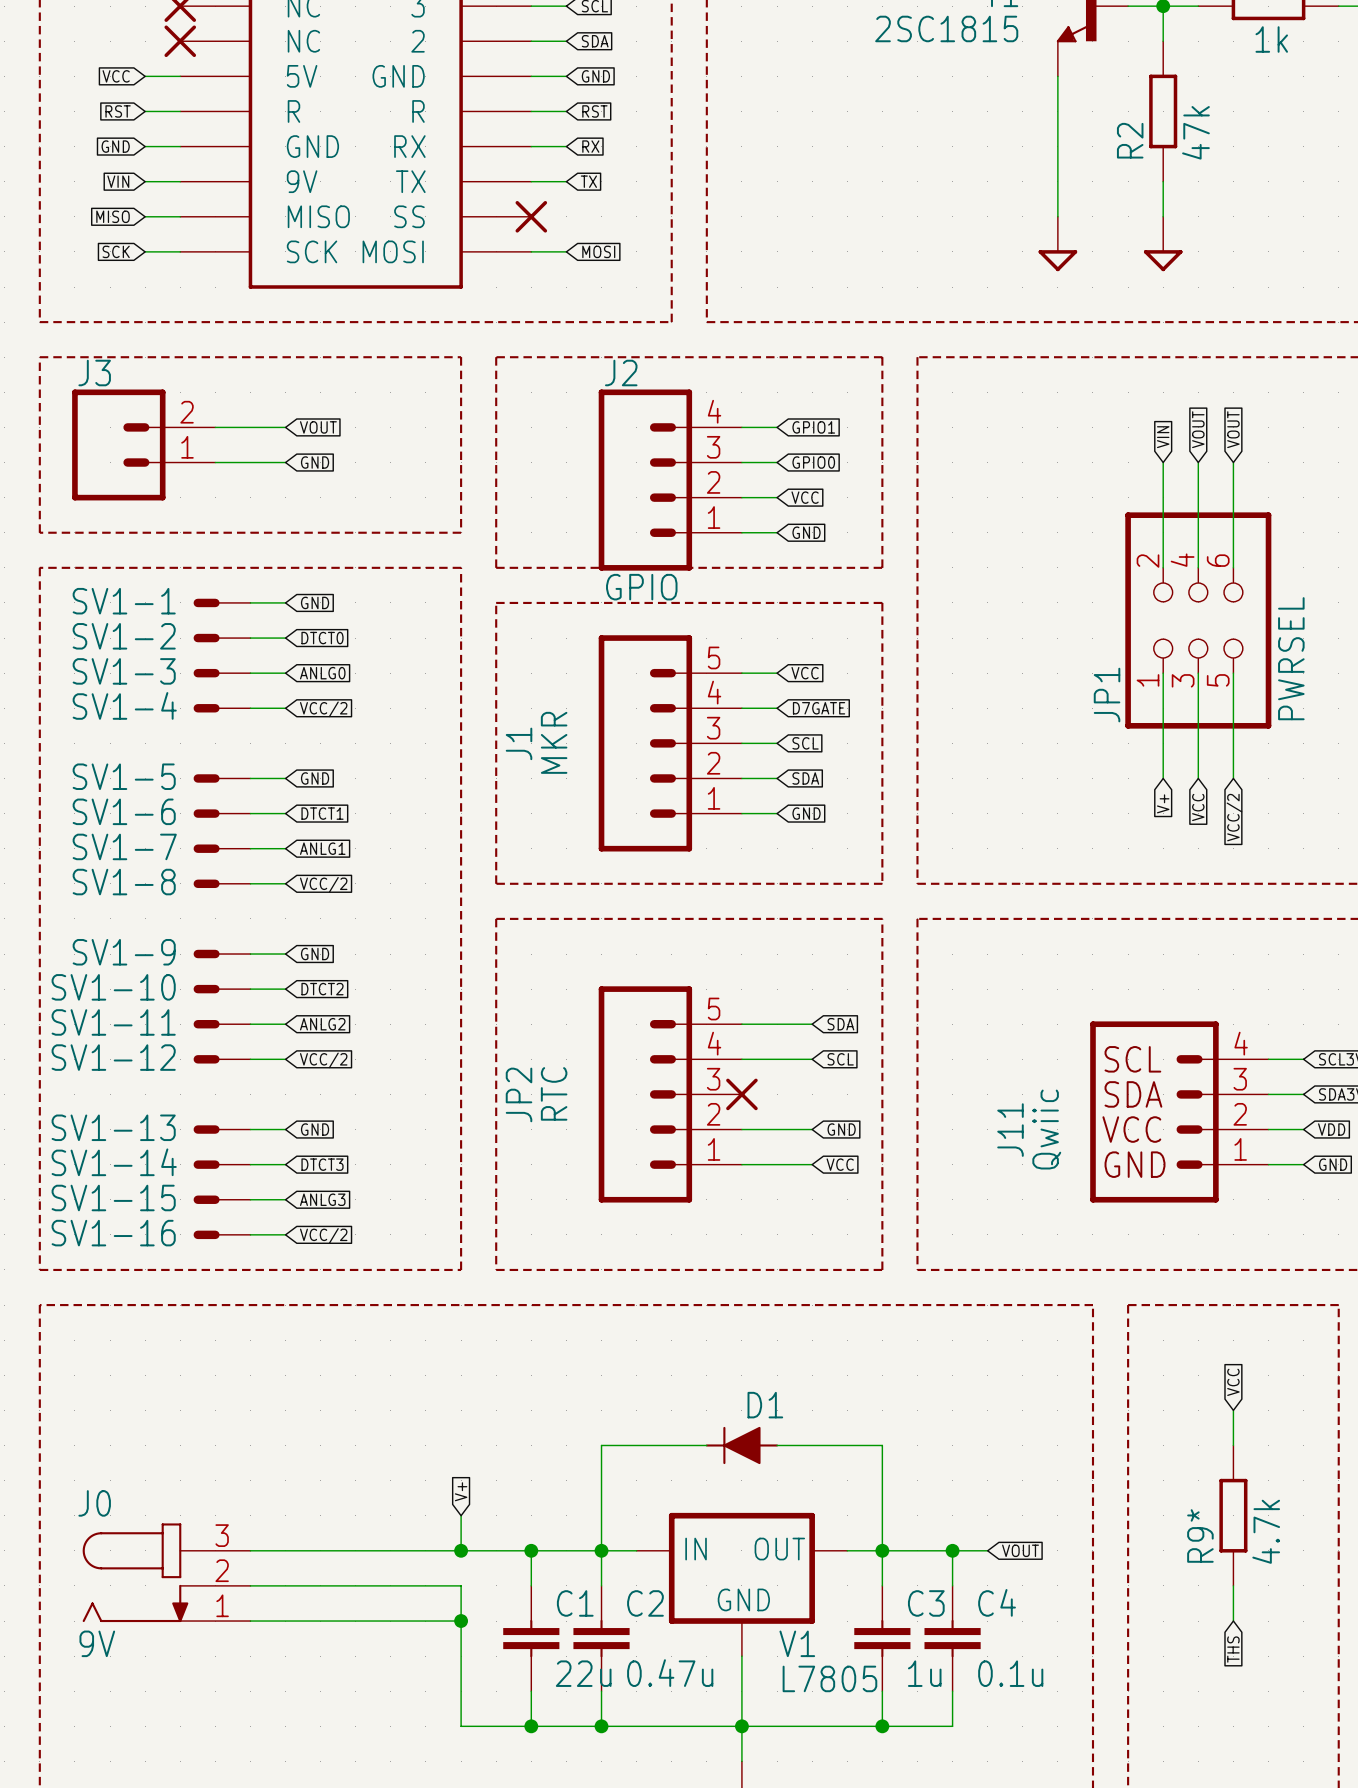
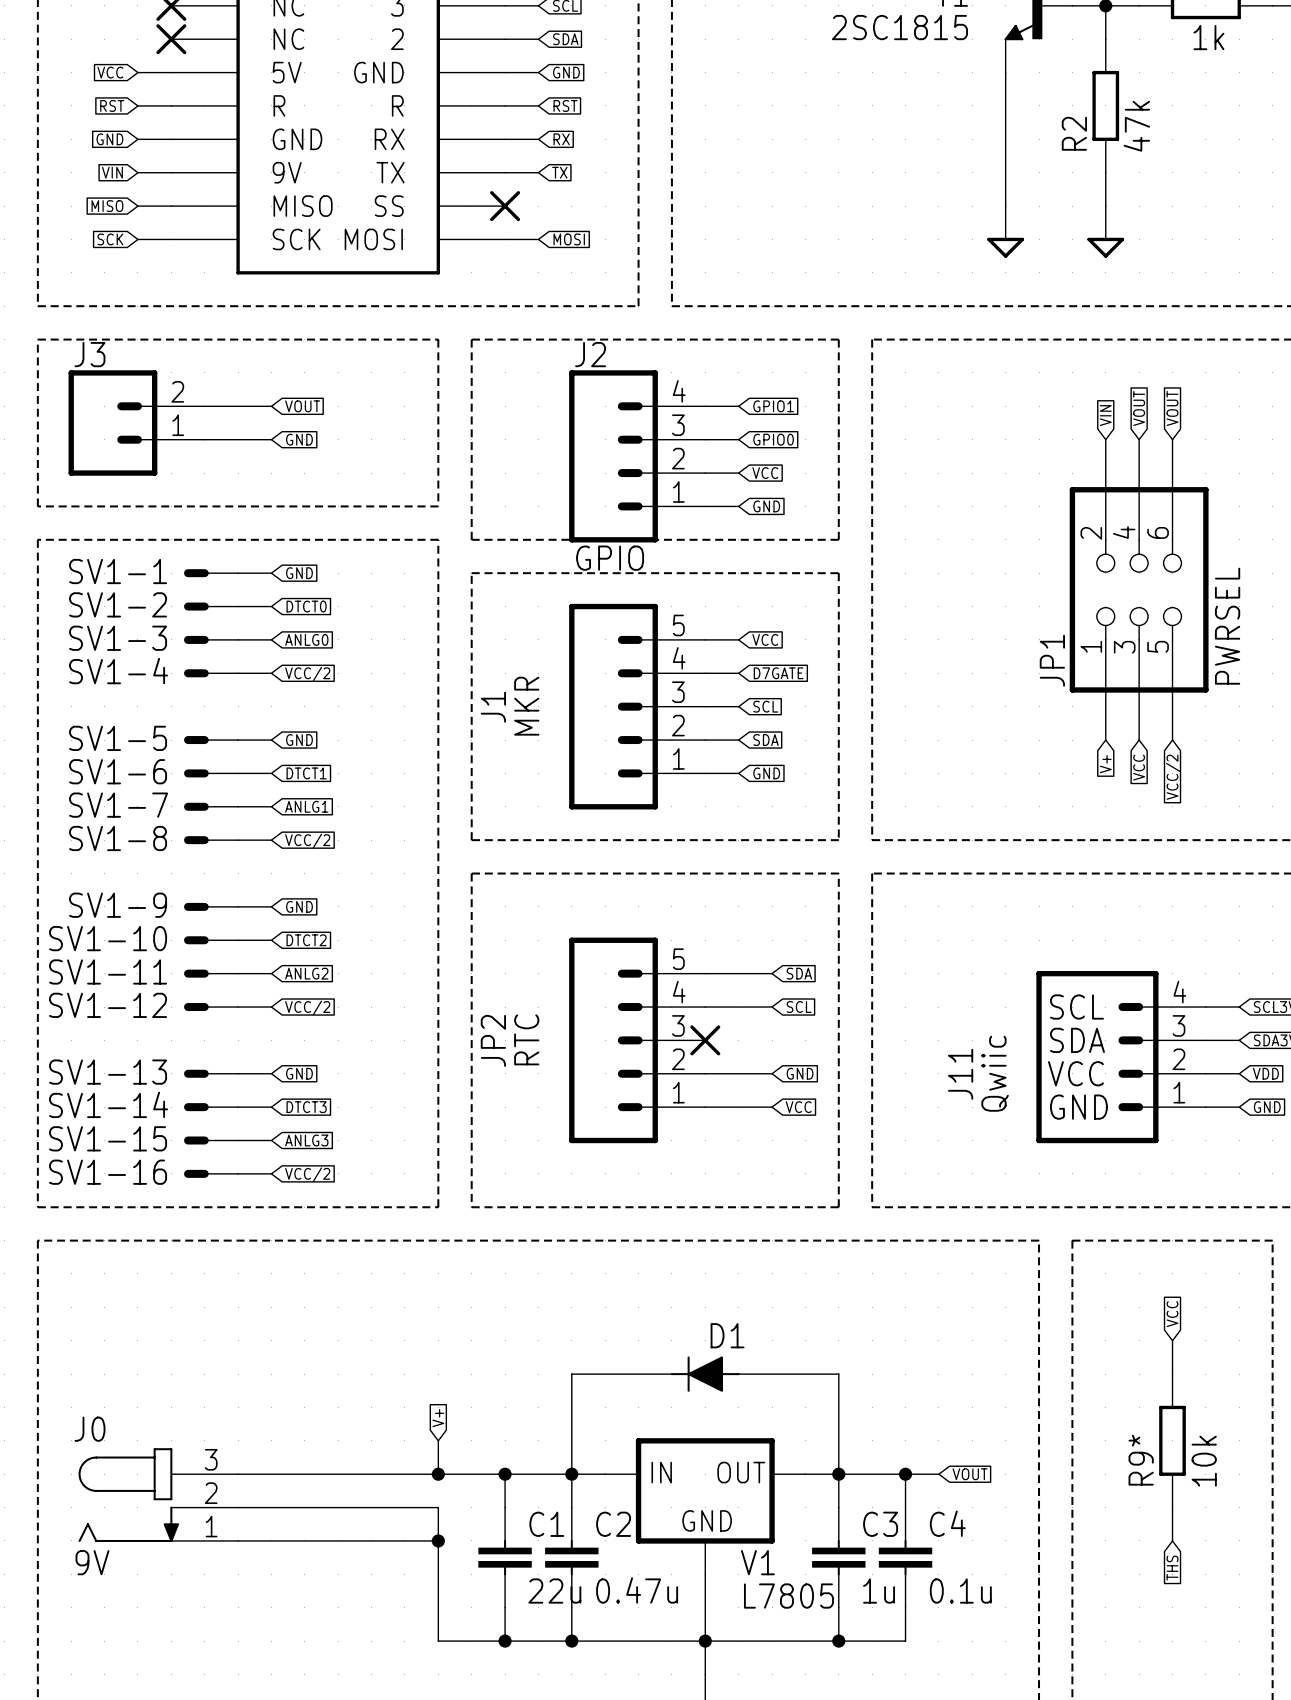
R9* value: 4.7k (1266, 1531) -> 10k (1204, 1461)

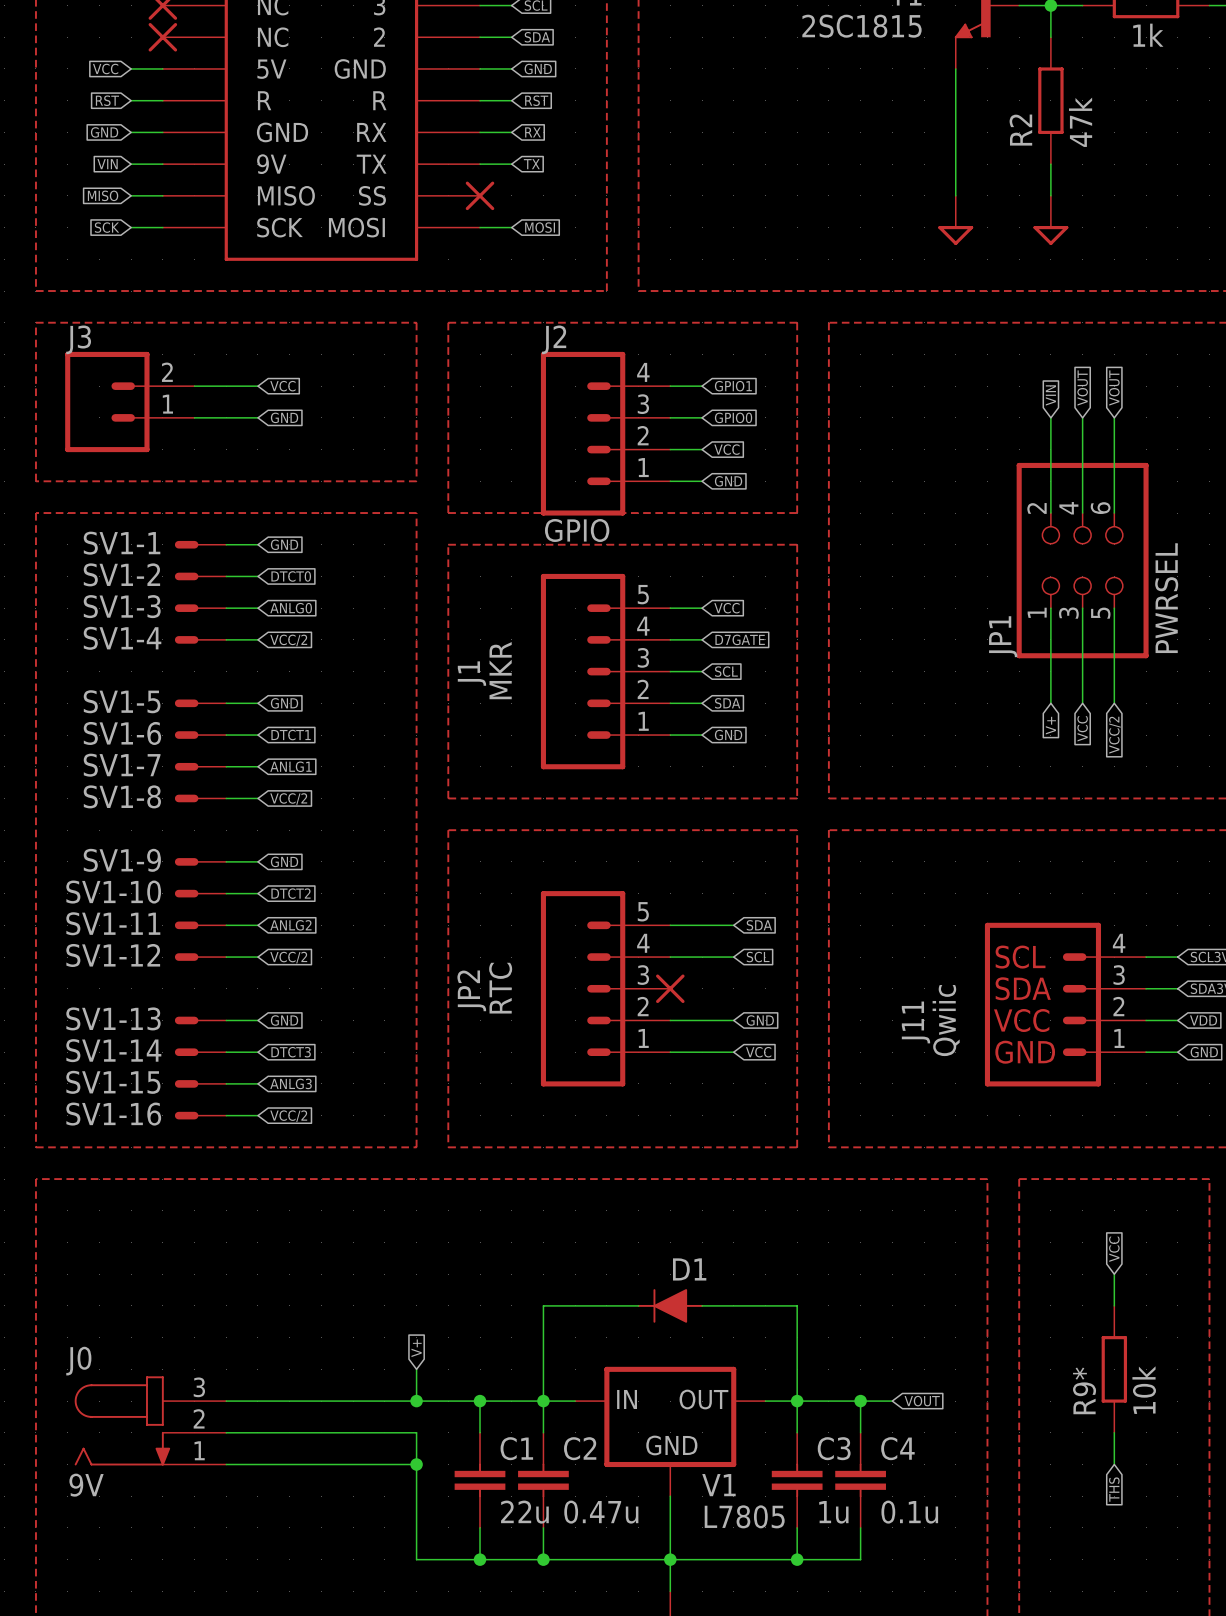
global label: VOUT (302, 406) -> VCC (282, 386)

